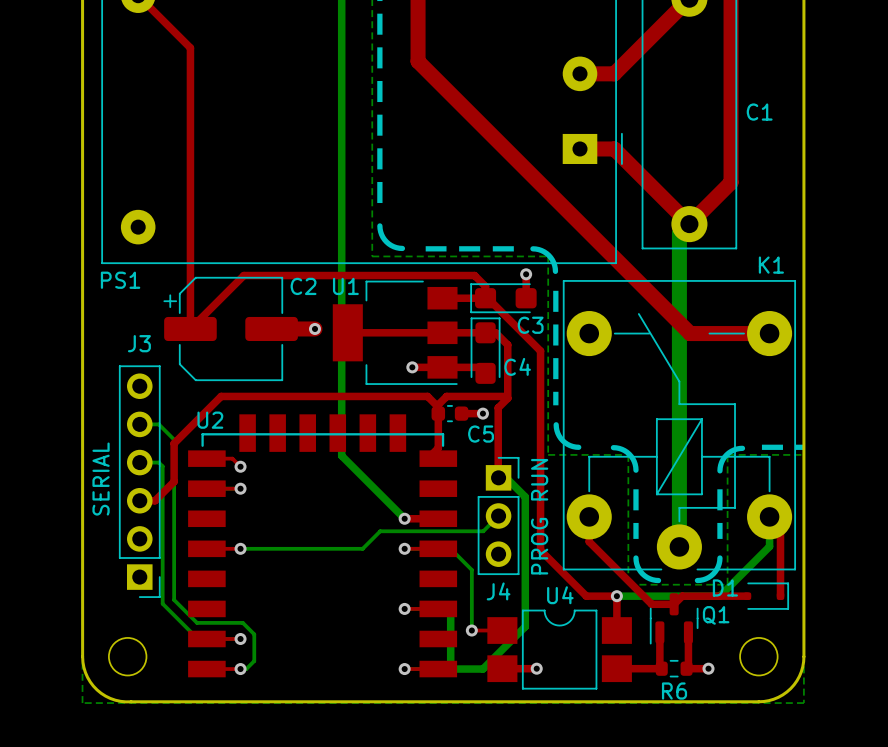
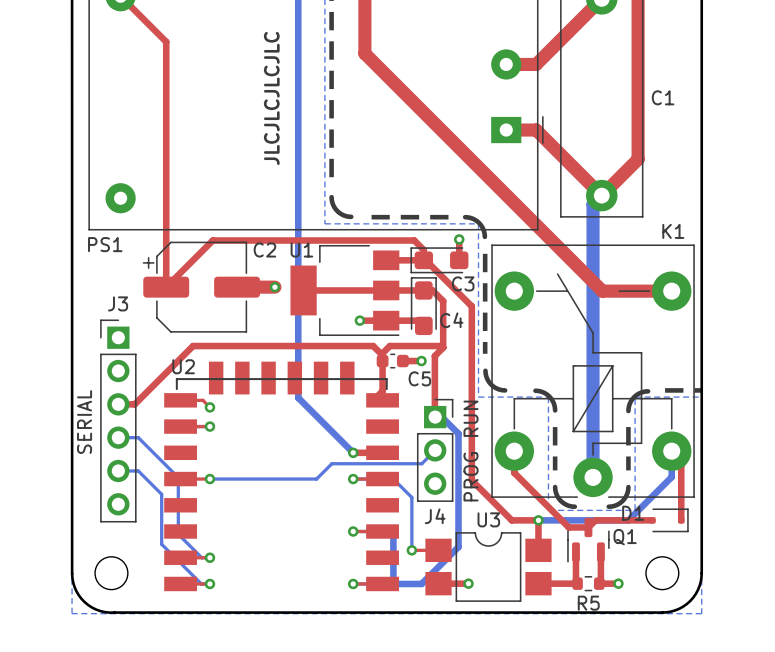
text: none -> JLCJLCJLCJLC (271, 98)
J3 footprint: [118, 365, 161, 598] -> [100, 319, 137, 523]
bottom track: (139, 424) (158, 424) (174, 439) (174, 599) (197, 622) (242, 622) (254, 634) (254, 661) (246, 669) (240, 669) -> (118, 470) (138, 470) (161, 494) (161, 544) (201, 583) (209, 583)
top track: (174, 443) (174, 481) (155, 500) (139, 500) -> (151, 387) (134, 404) (118, 404)
bottom track: (139, 462) (158, 462) (162, 466) (162, 603) (197, 638) (231, 638) -> (118, 437) (138, 437) (178, 477) (178, 534) (201, 557)
U4 name: U4 (560, 595) -> U3 (488, 519)
R6 name: R6 (674, 691) -> R5 (588, 603)

